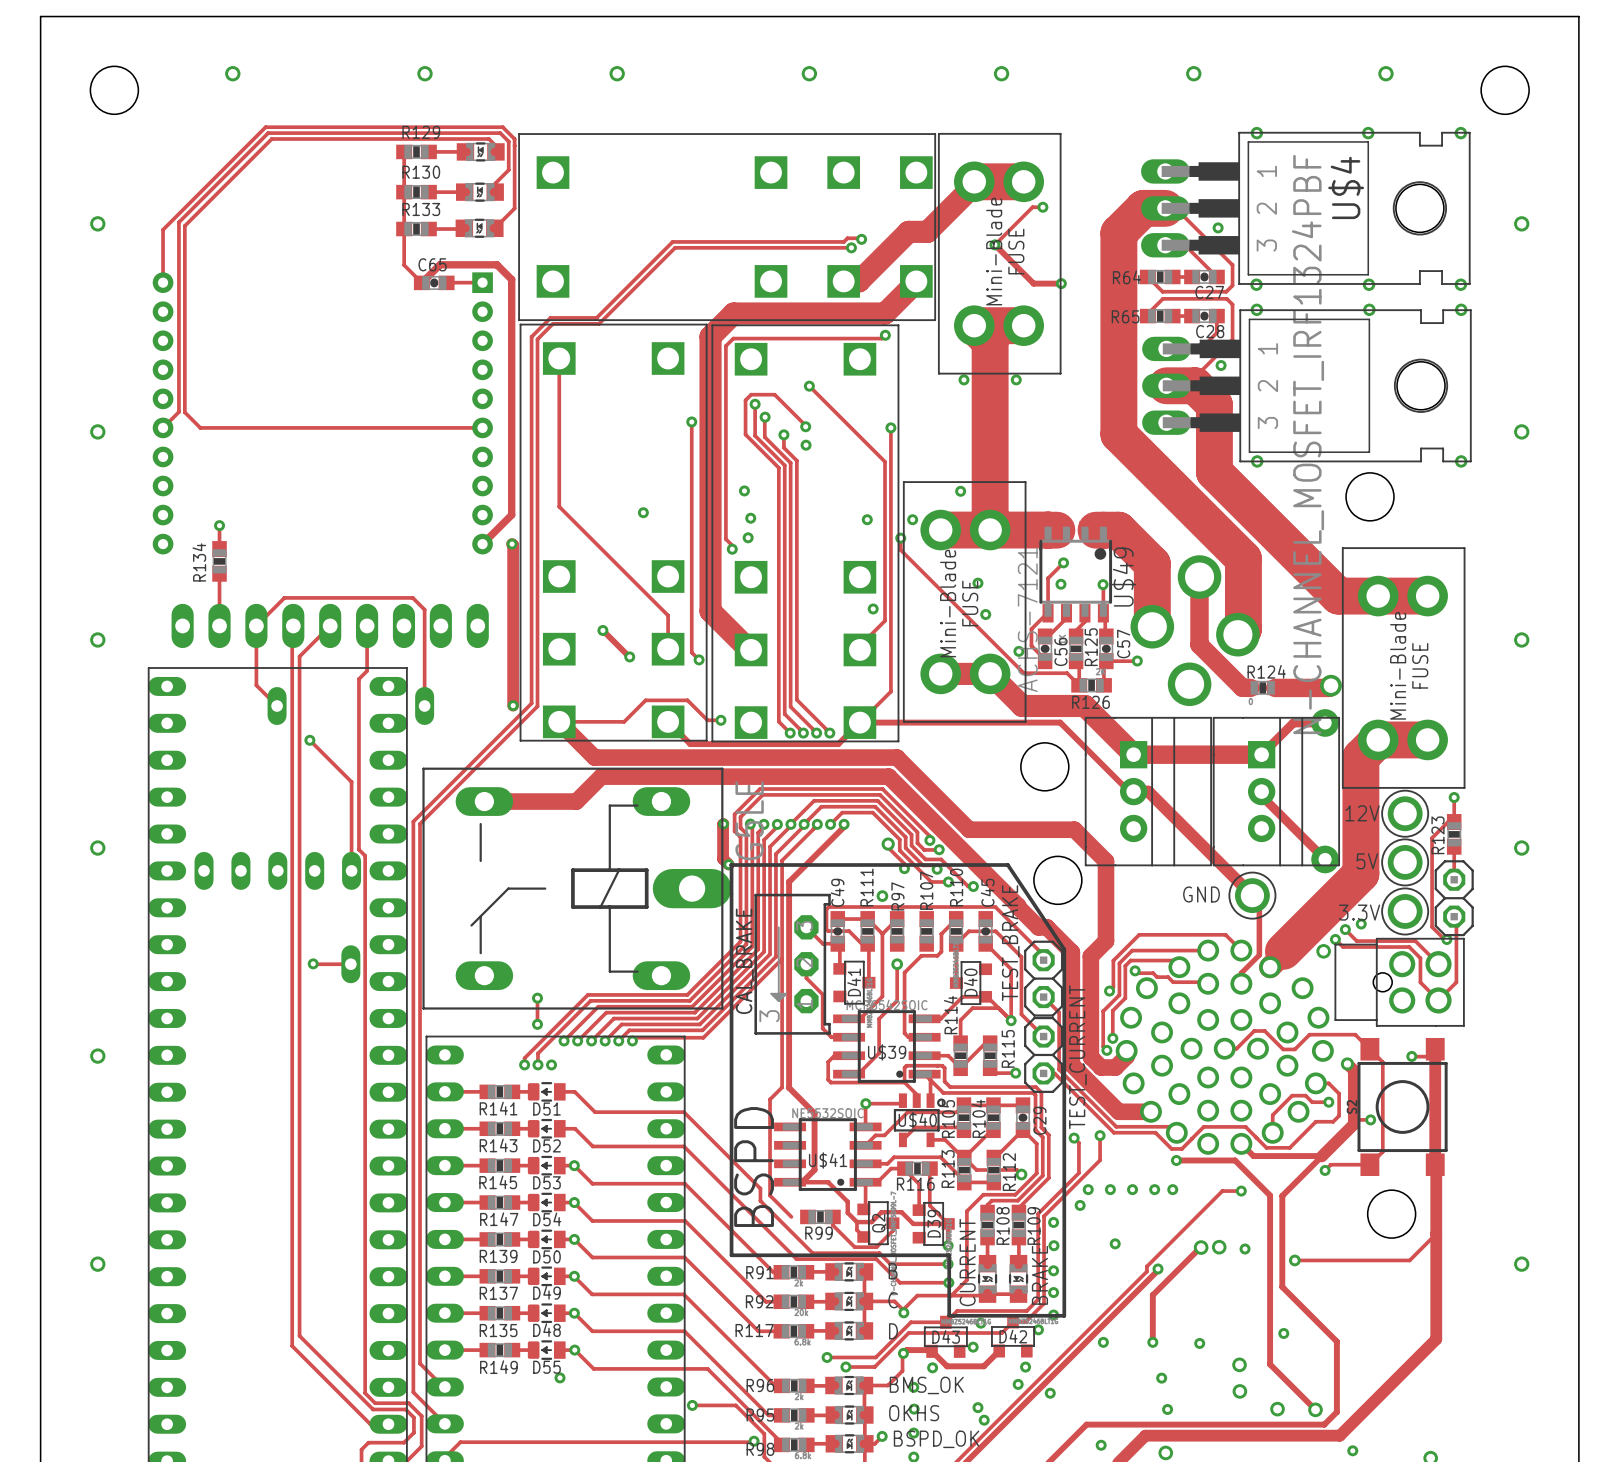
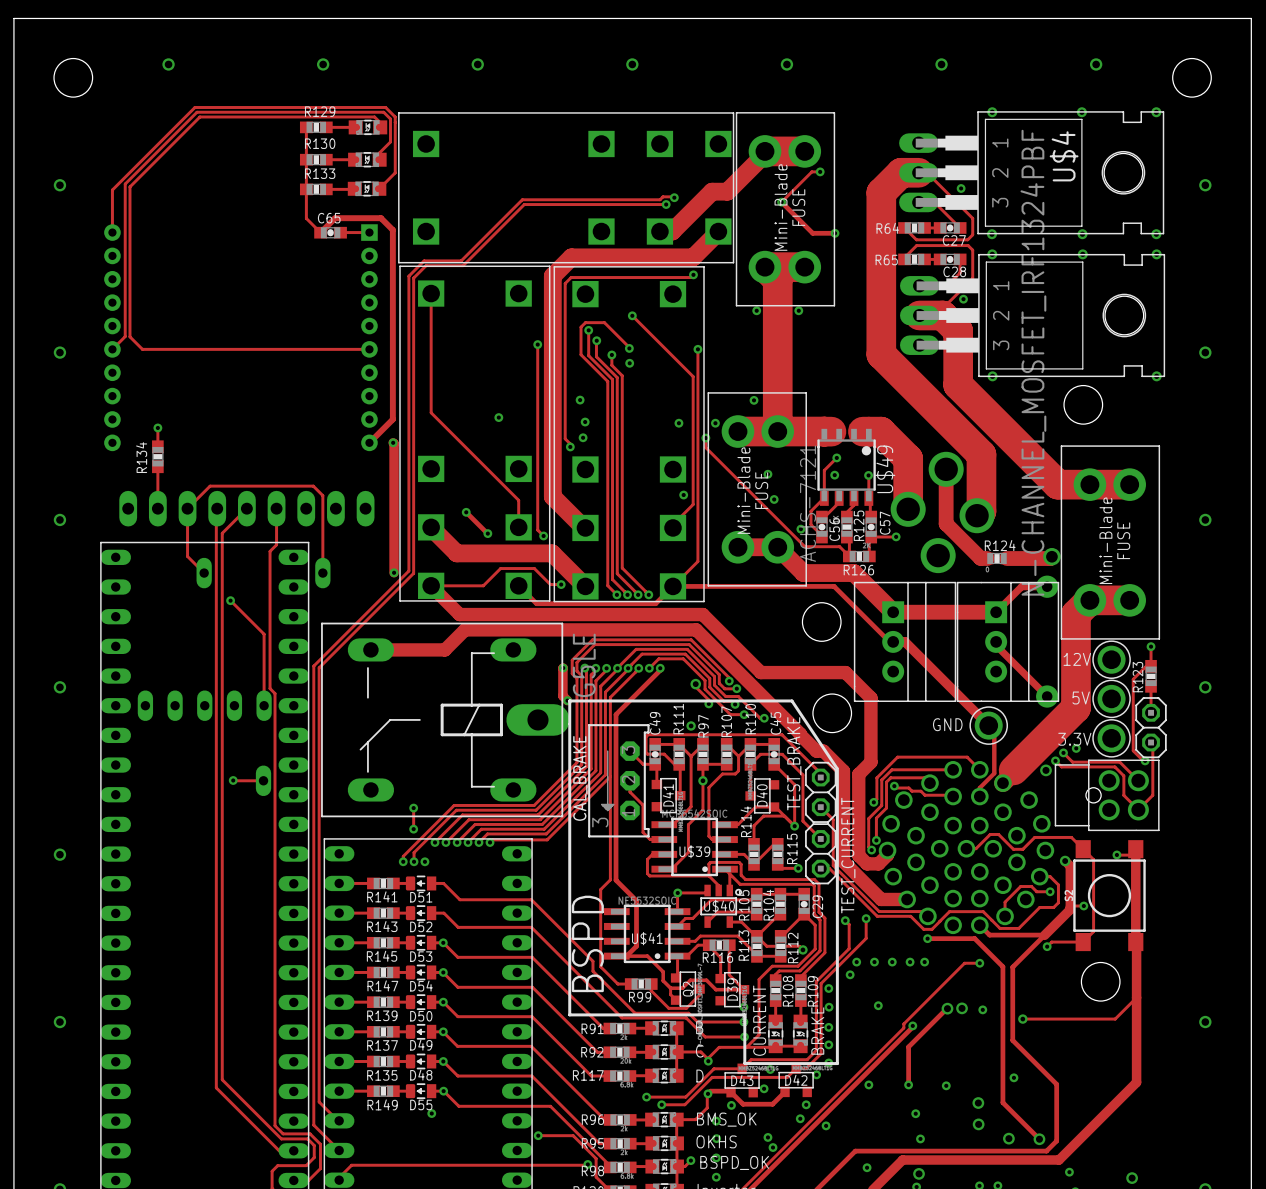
track: none -> (431, 527) (456, 553) (552, 553) (585, 586)
track: none -> (726, 744) (738, 756)
track: none -> (750, 744) (774, 744)
track: none -> (726, 764) (702, 764) (702, 780)
track: none -> (617, 984) (631, 984)

